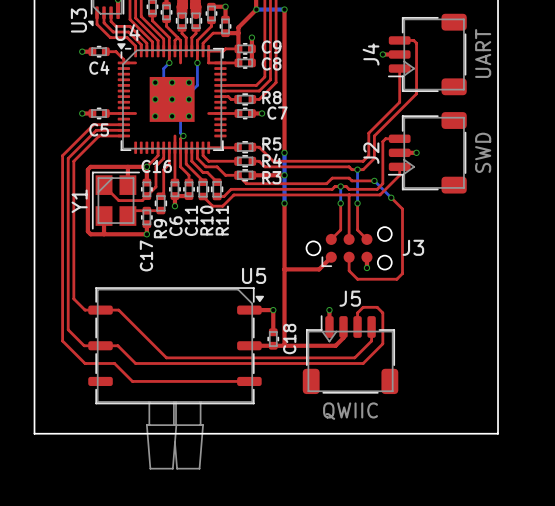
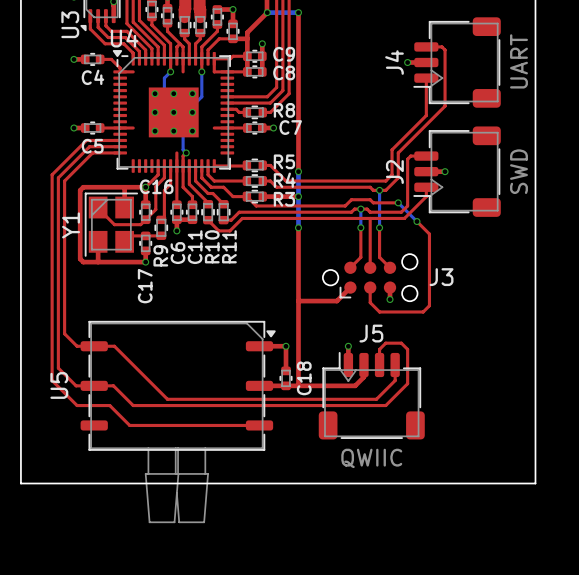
U5 name rotation: 0° (254, 275) -> 90° counterclockwise (59, 385)
U5 name position: U5 (254, 275) -> U5 (59, 385)

